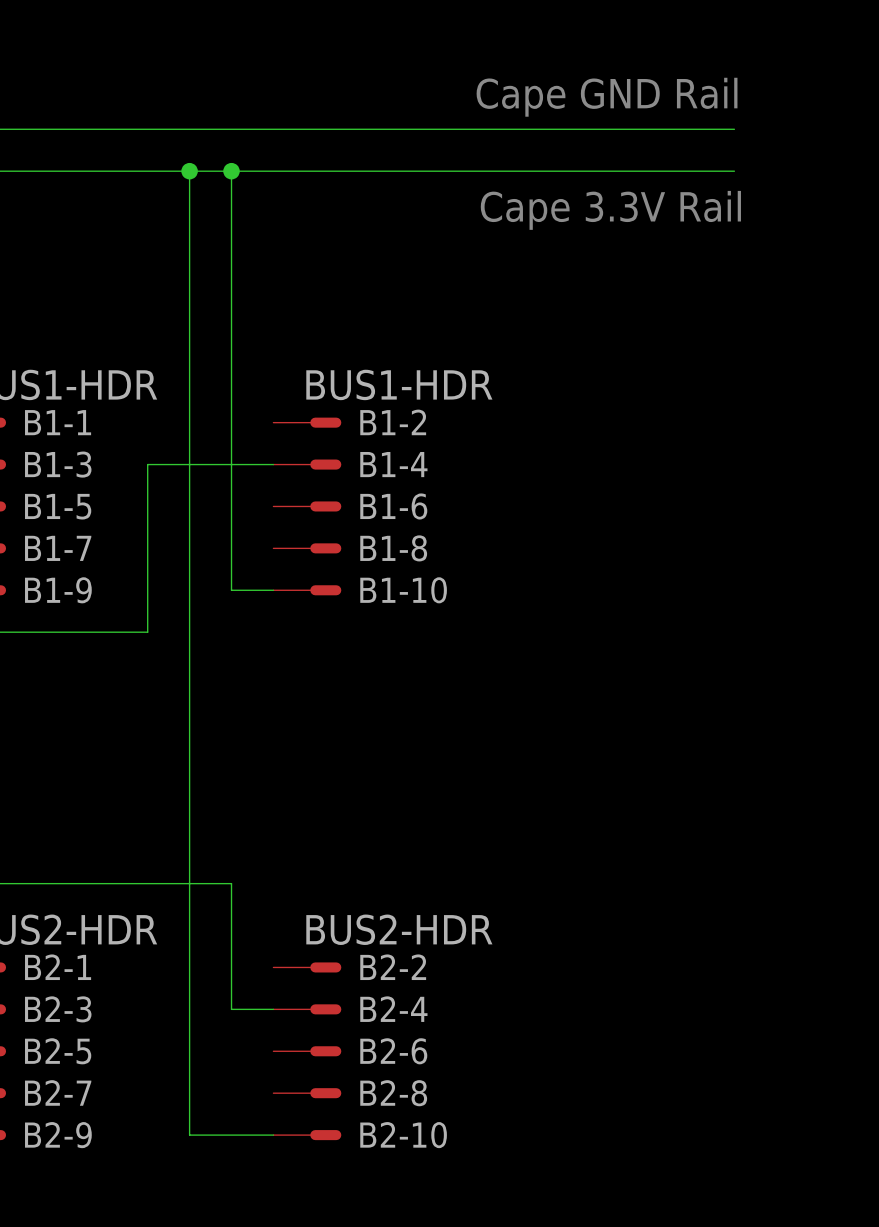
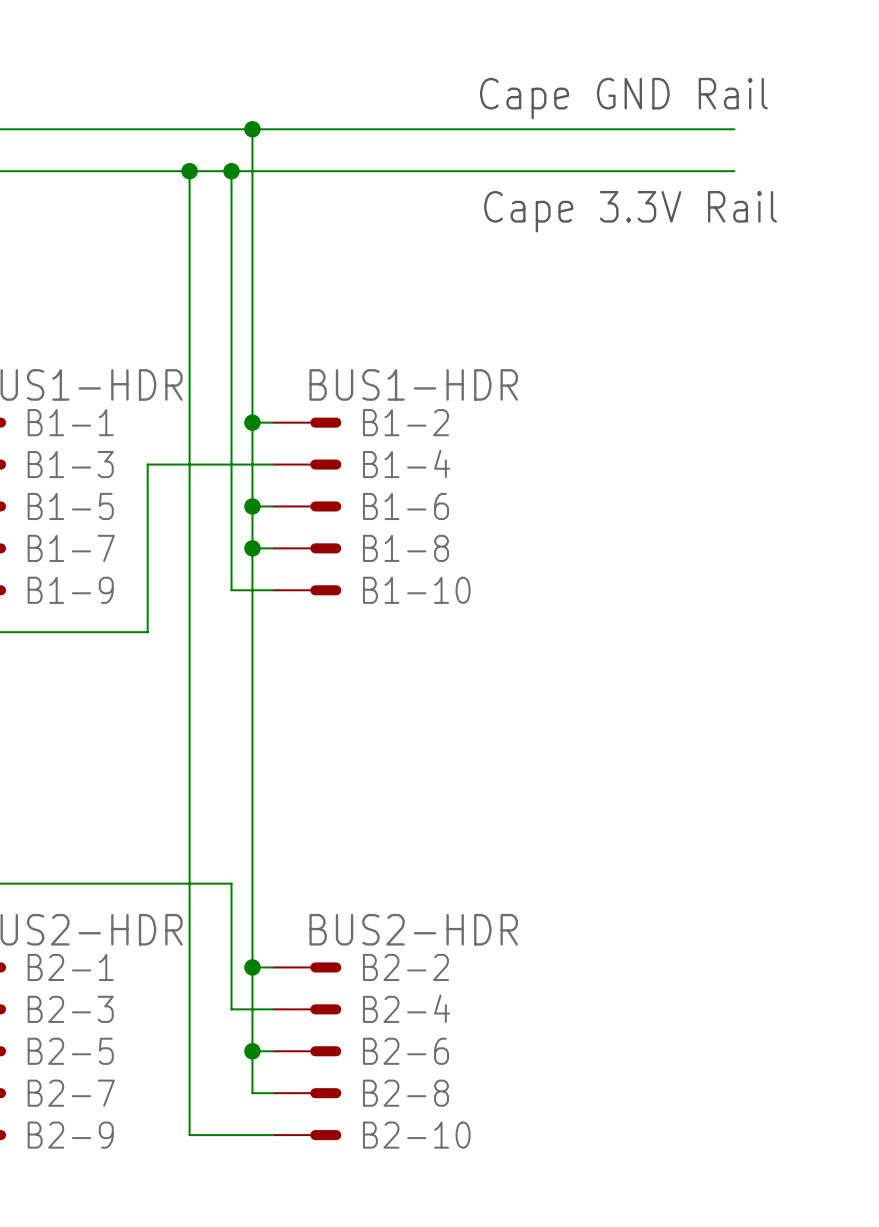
wire: none -> (252, 129) (252, 1093) (273, 1093)
junction: none -> (252, 129)
wire: none -> (252, 422) (273, 422)
junction: none -> (252, 422)
wire: none -> (252, 506) (273, 506)
junction: none -> (252, 506)
wire: none -> (252, 548) (273, 548)
junction: none -> (252, 548)
wire: none -> (252, 967) (273, 967)
junction: none -> (252, 967)
wire: none -> (252, 1051) (273, 1051)
junction: none -> (252, 1051)

